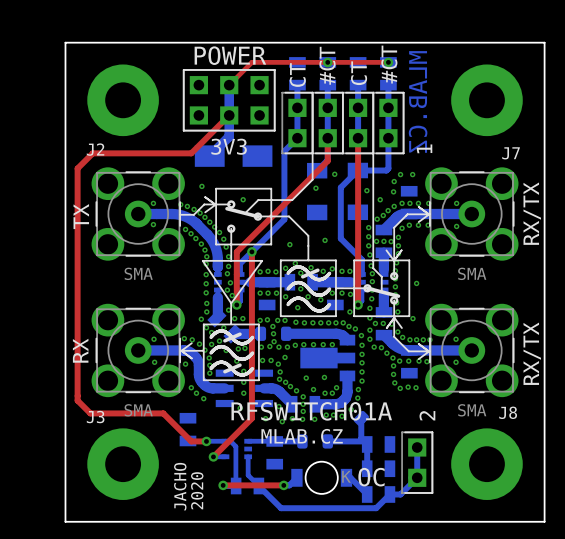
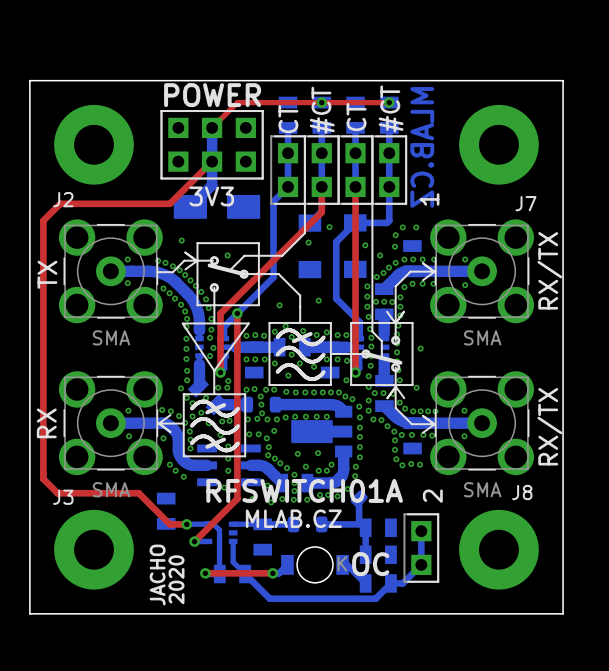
via: (232, 295) -> none
via: (228, 310) -> none
via: none -> (228, 380)

